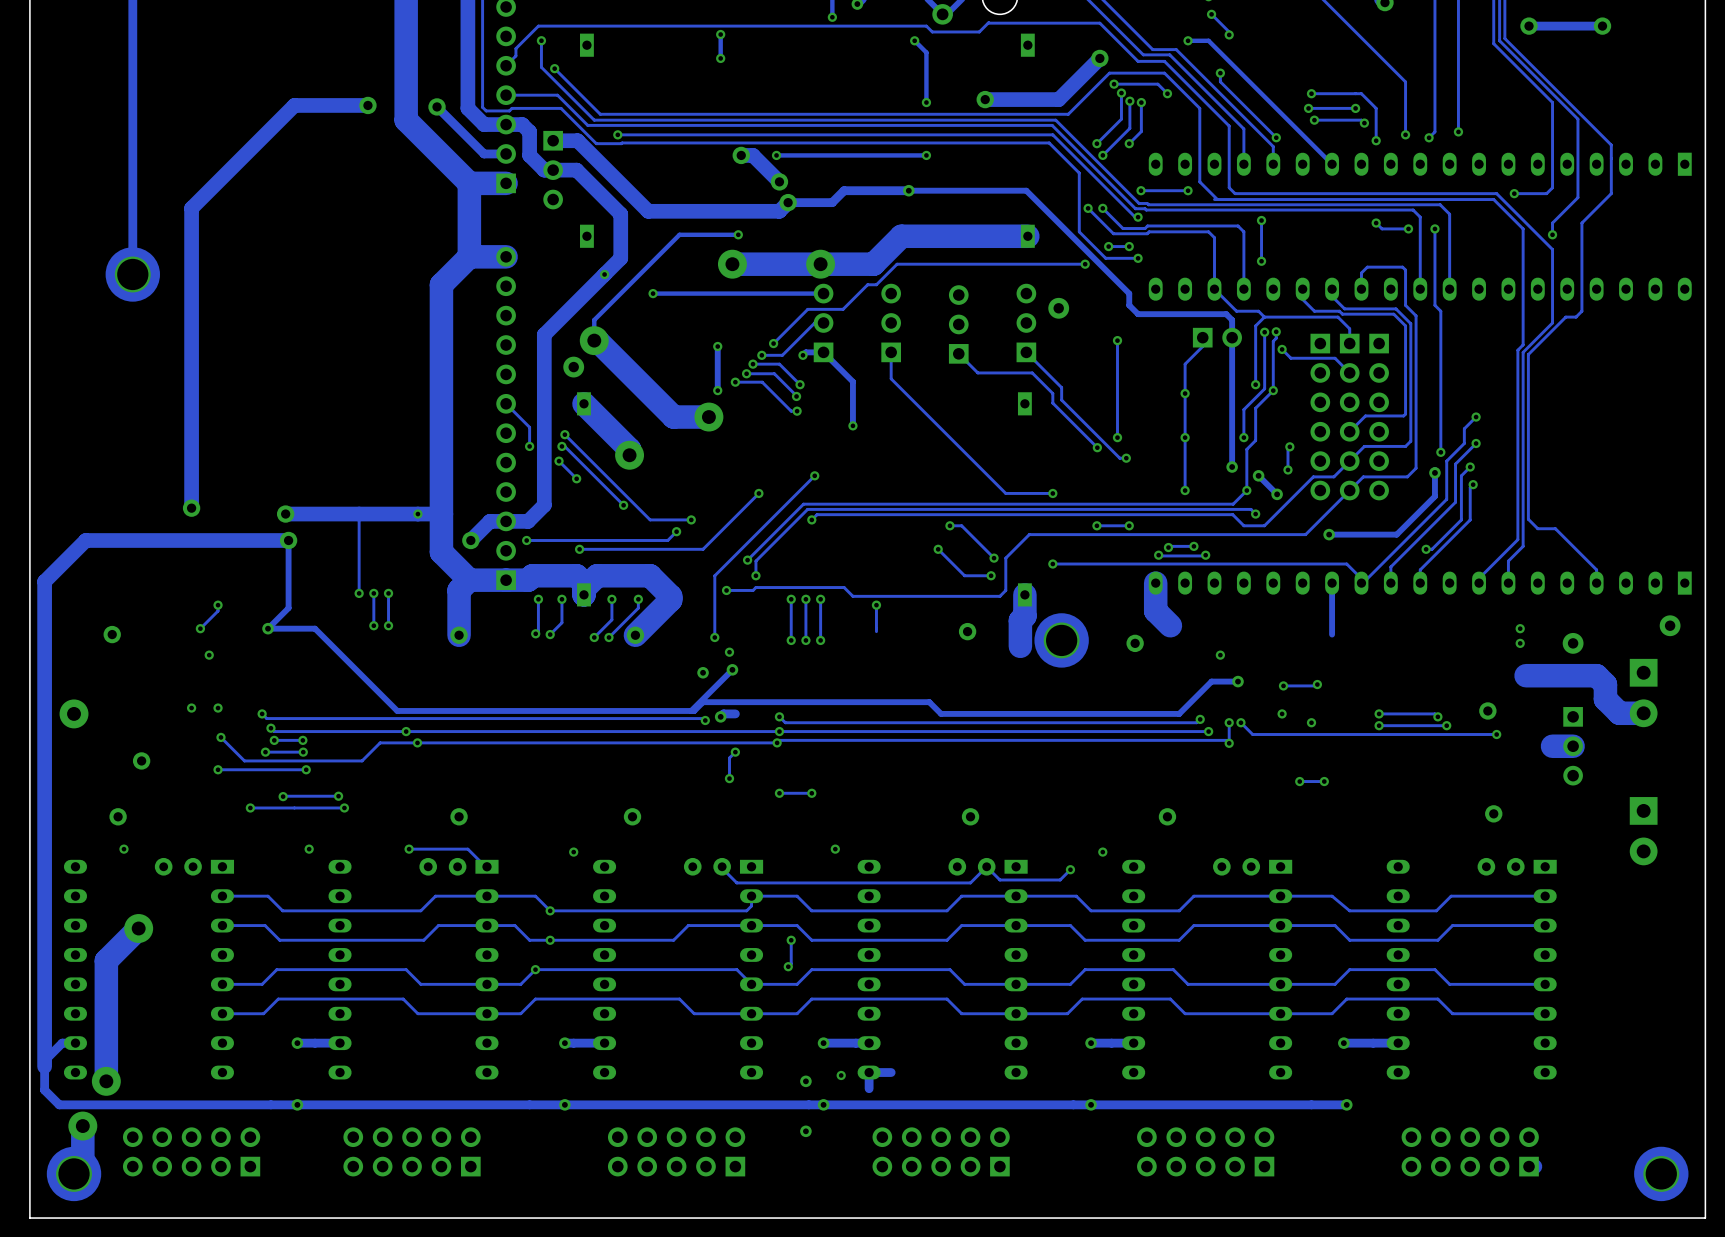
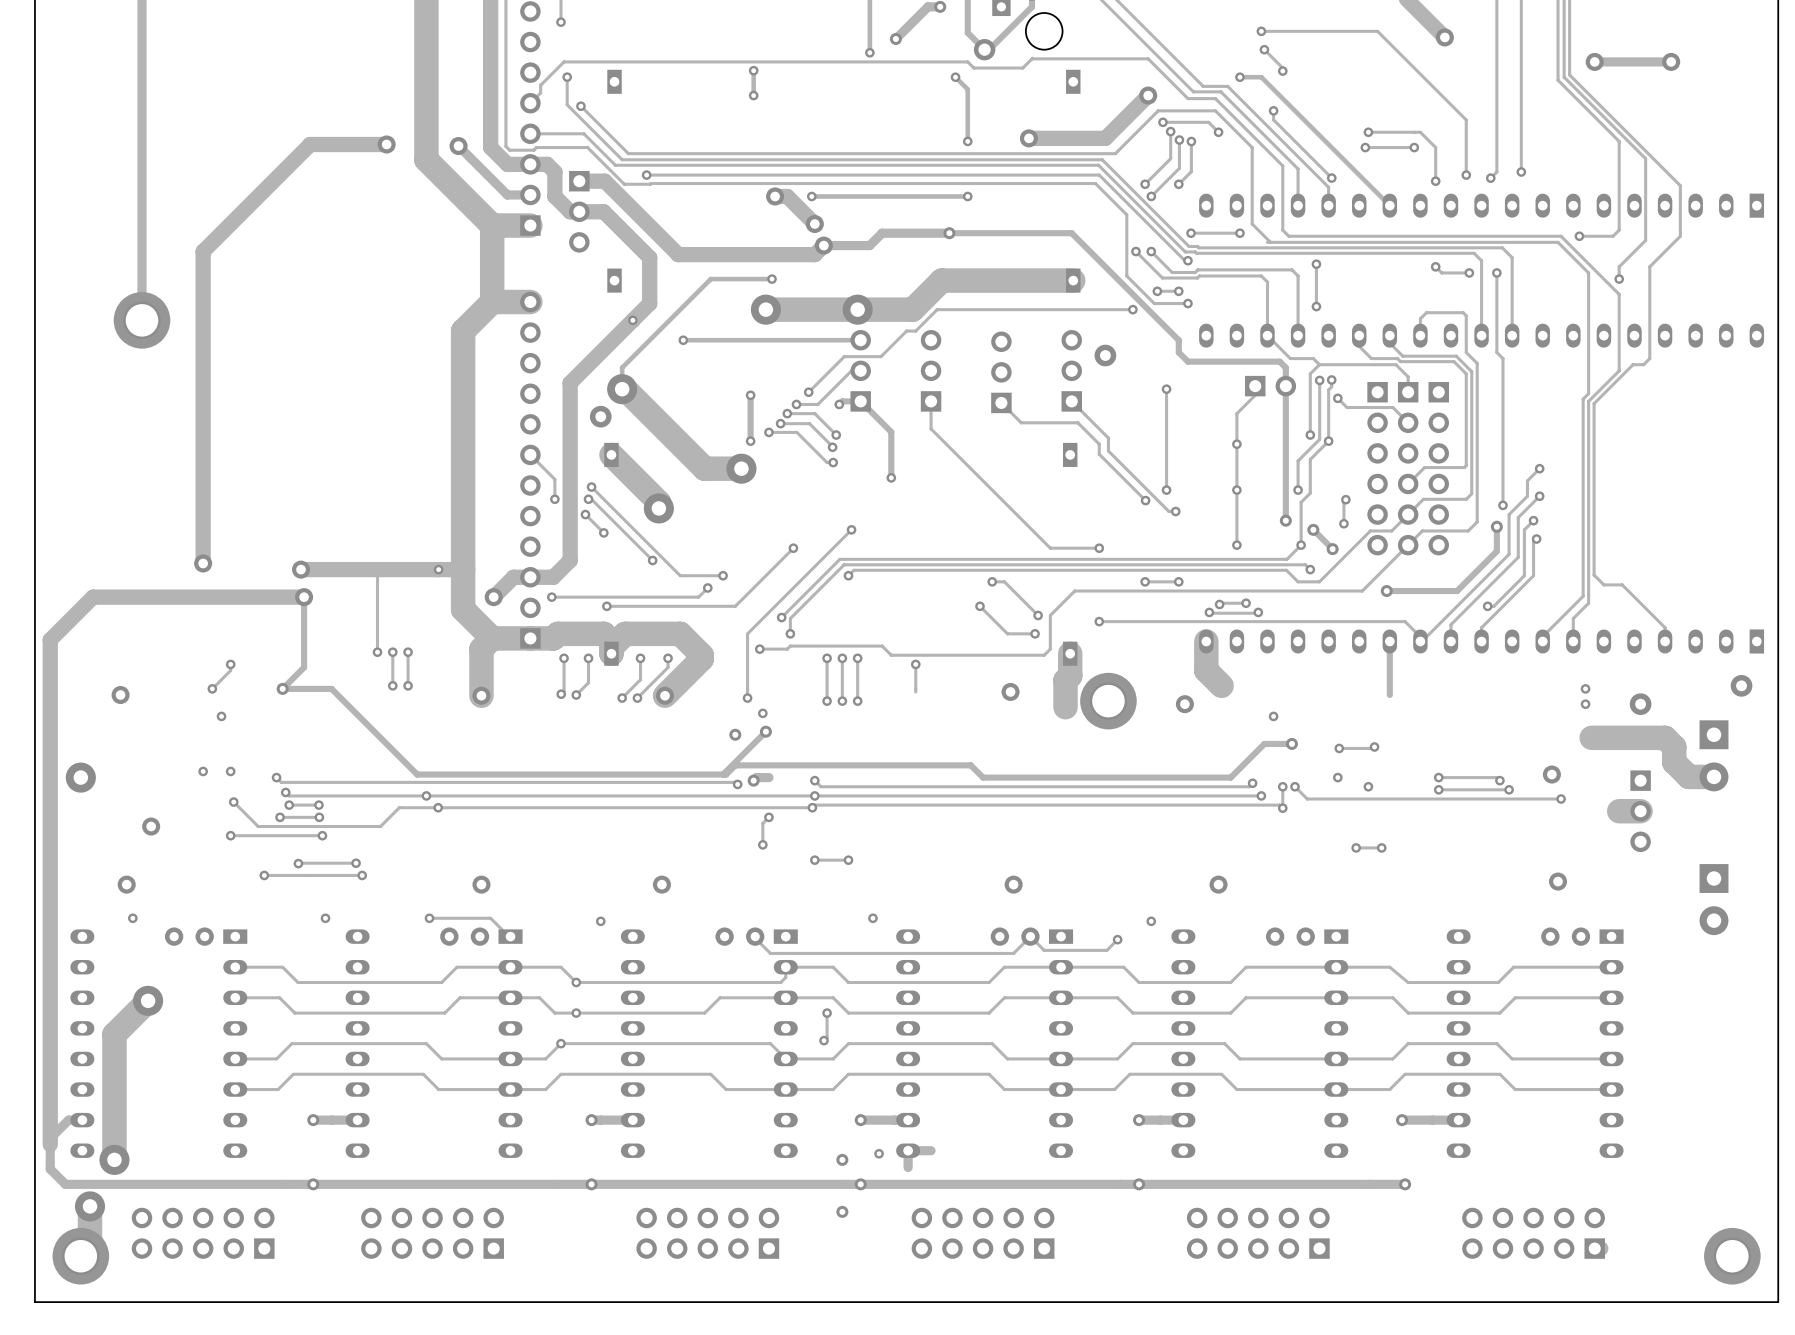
track: (1314, 120) (1361, 120) (1364, 123) -> none
via: (1314, 120) -> none
via: (1364, 123) -> none

